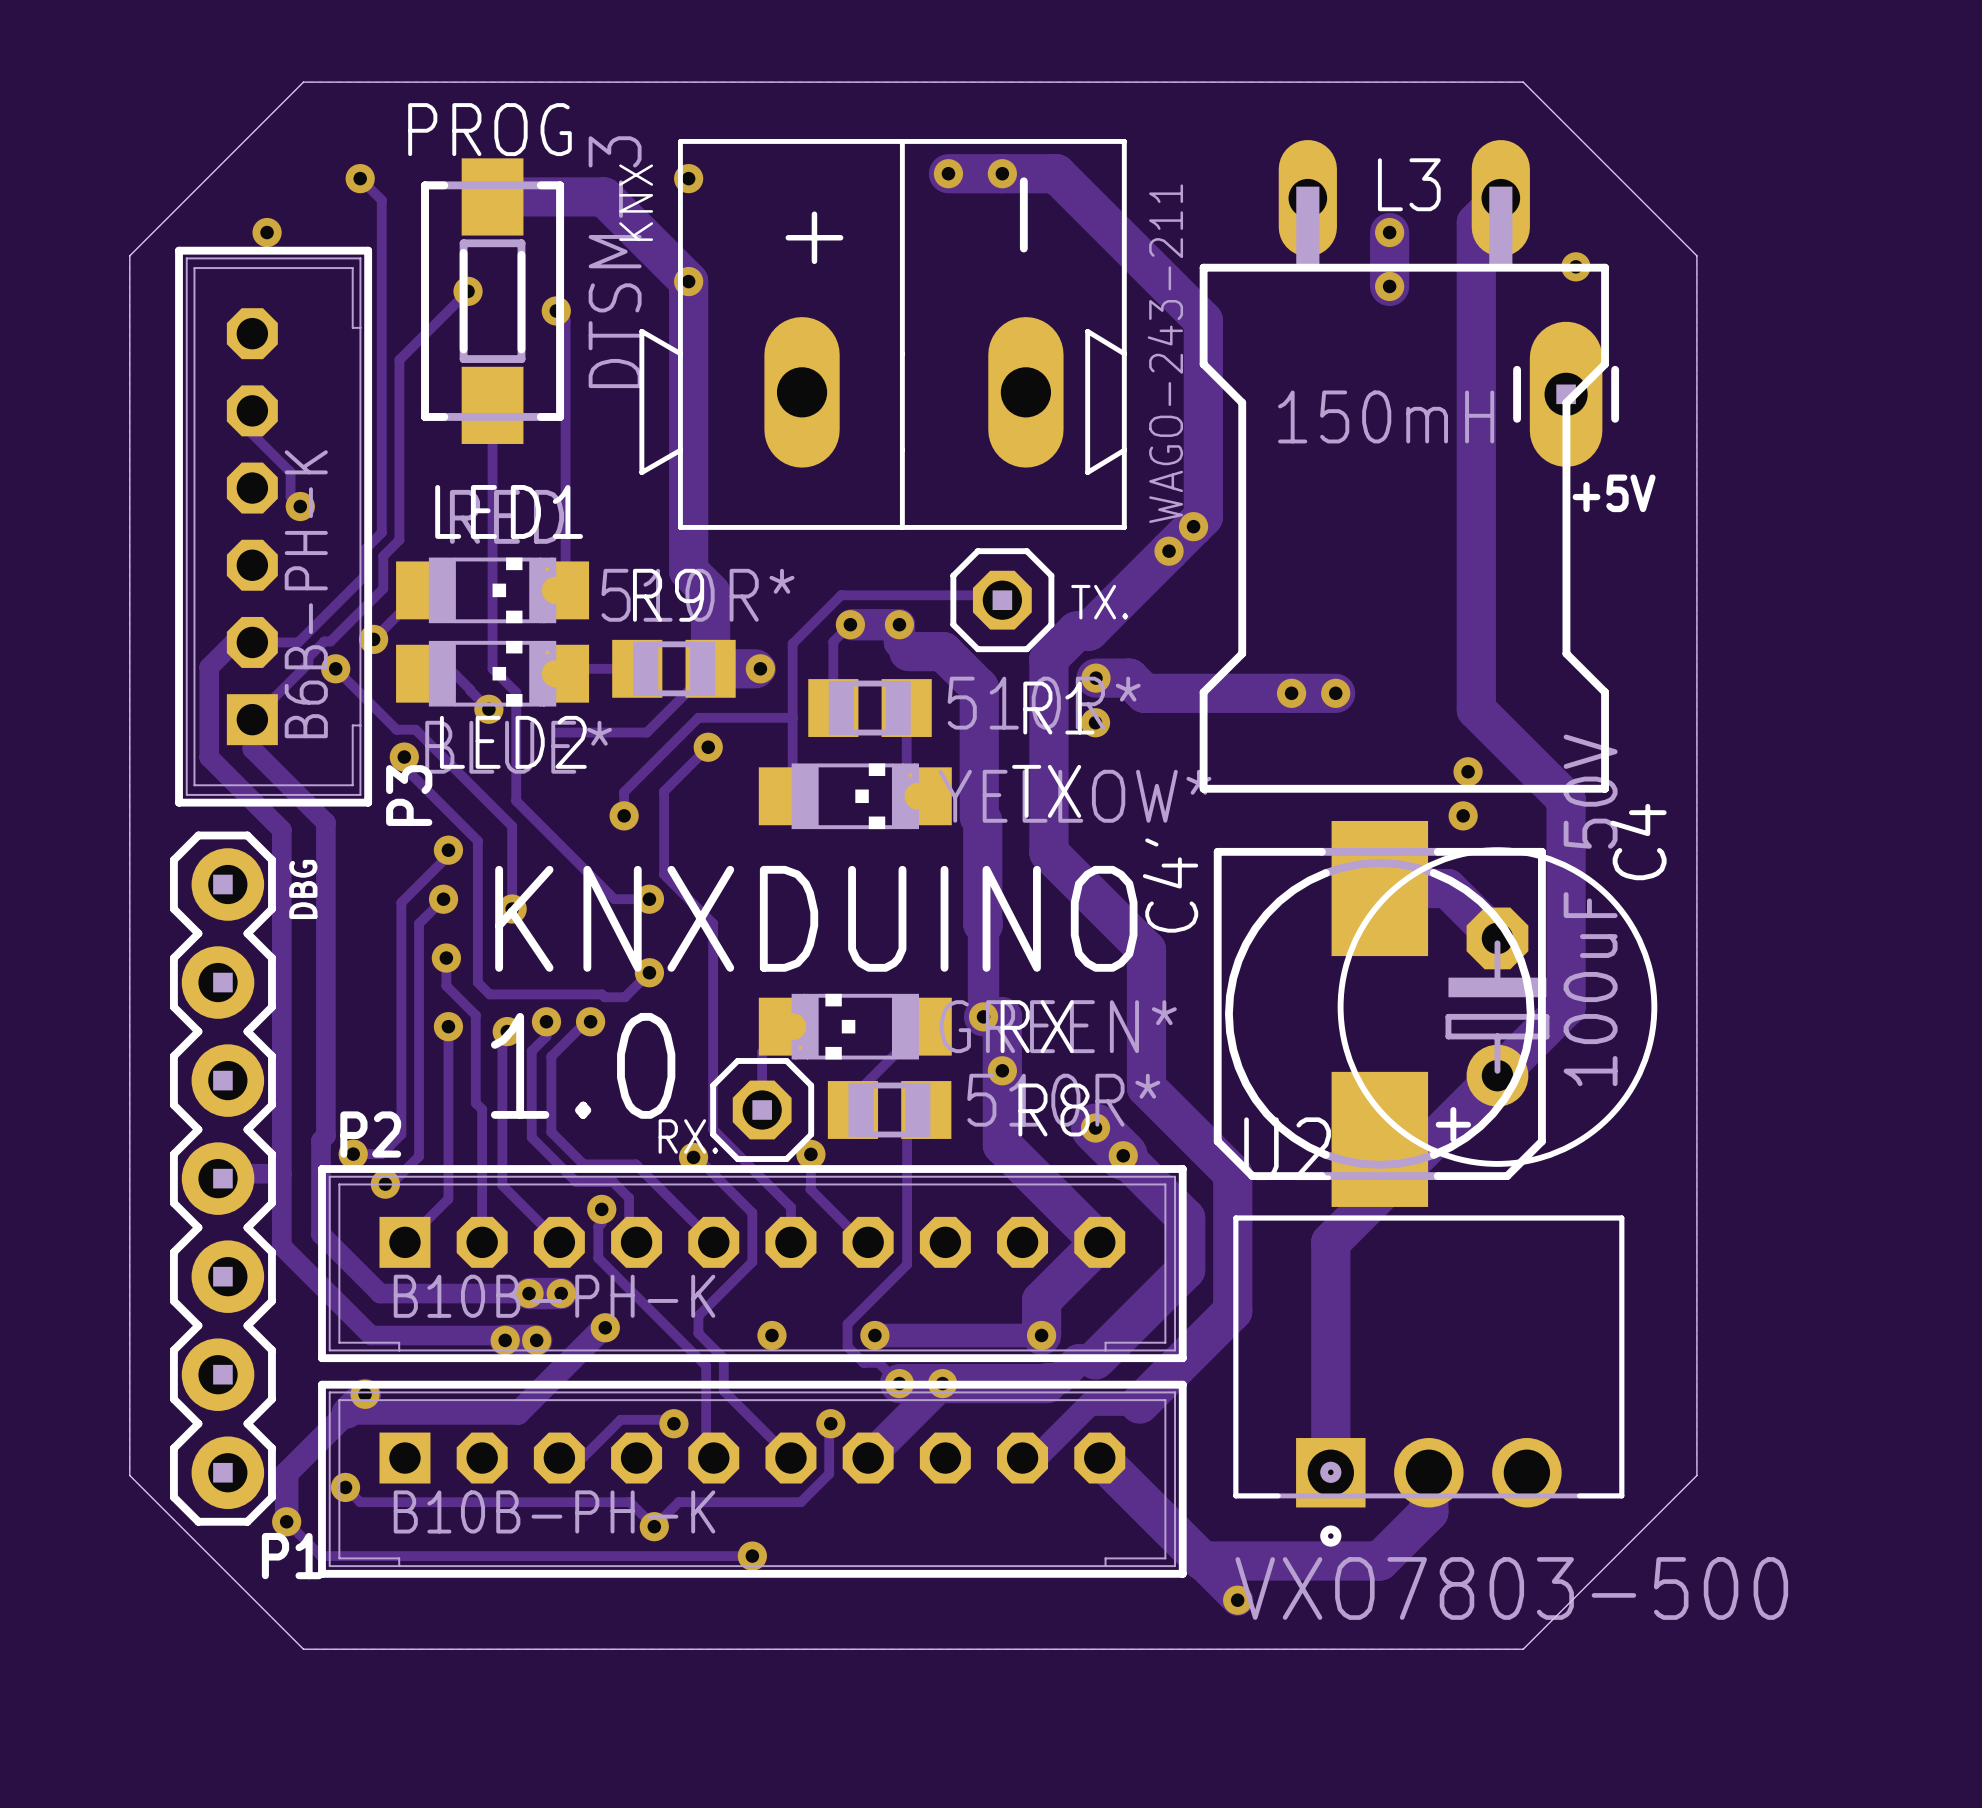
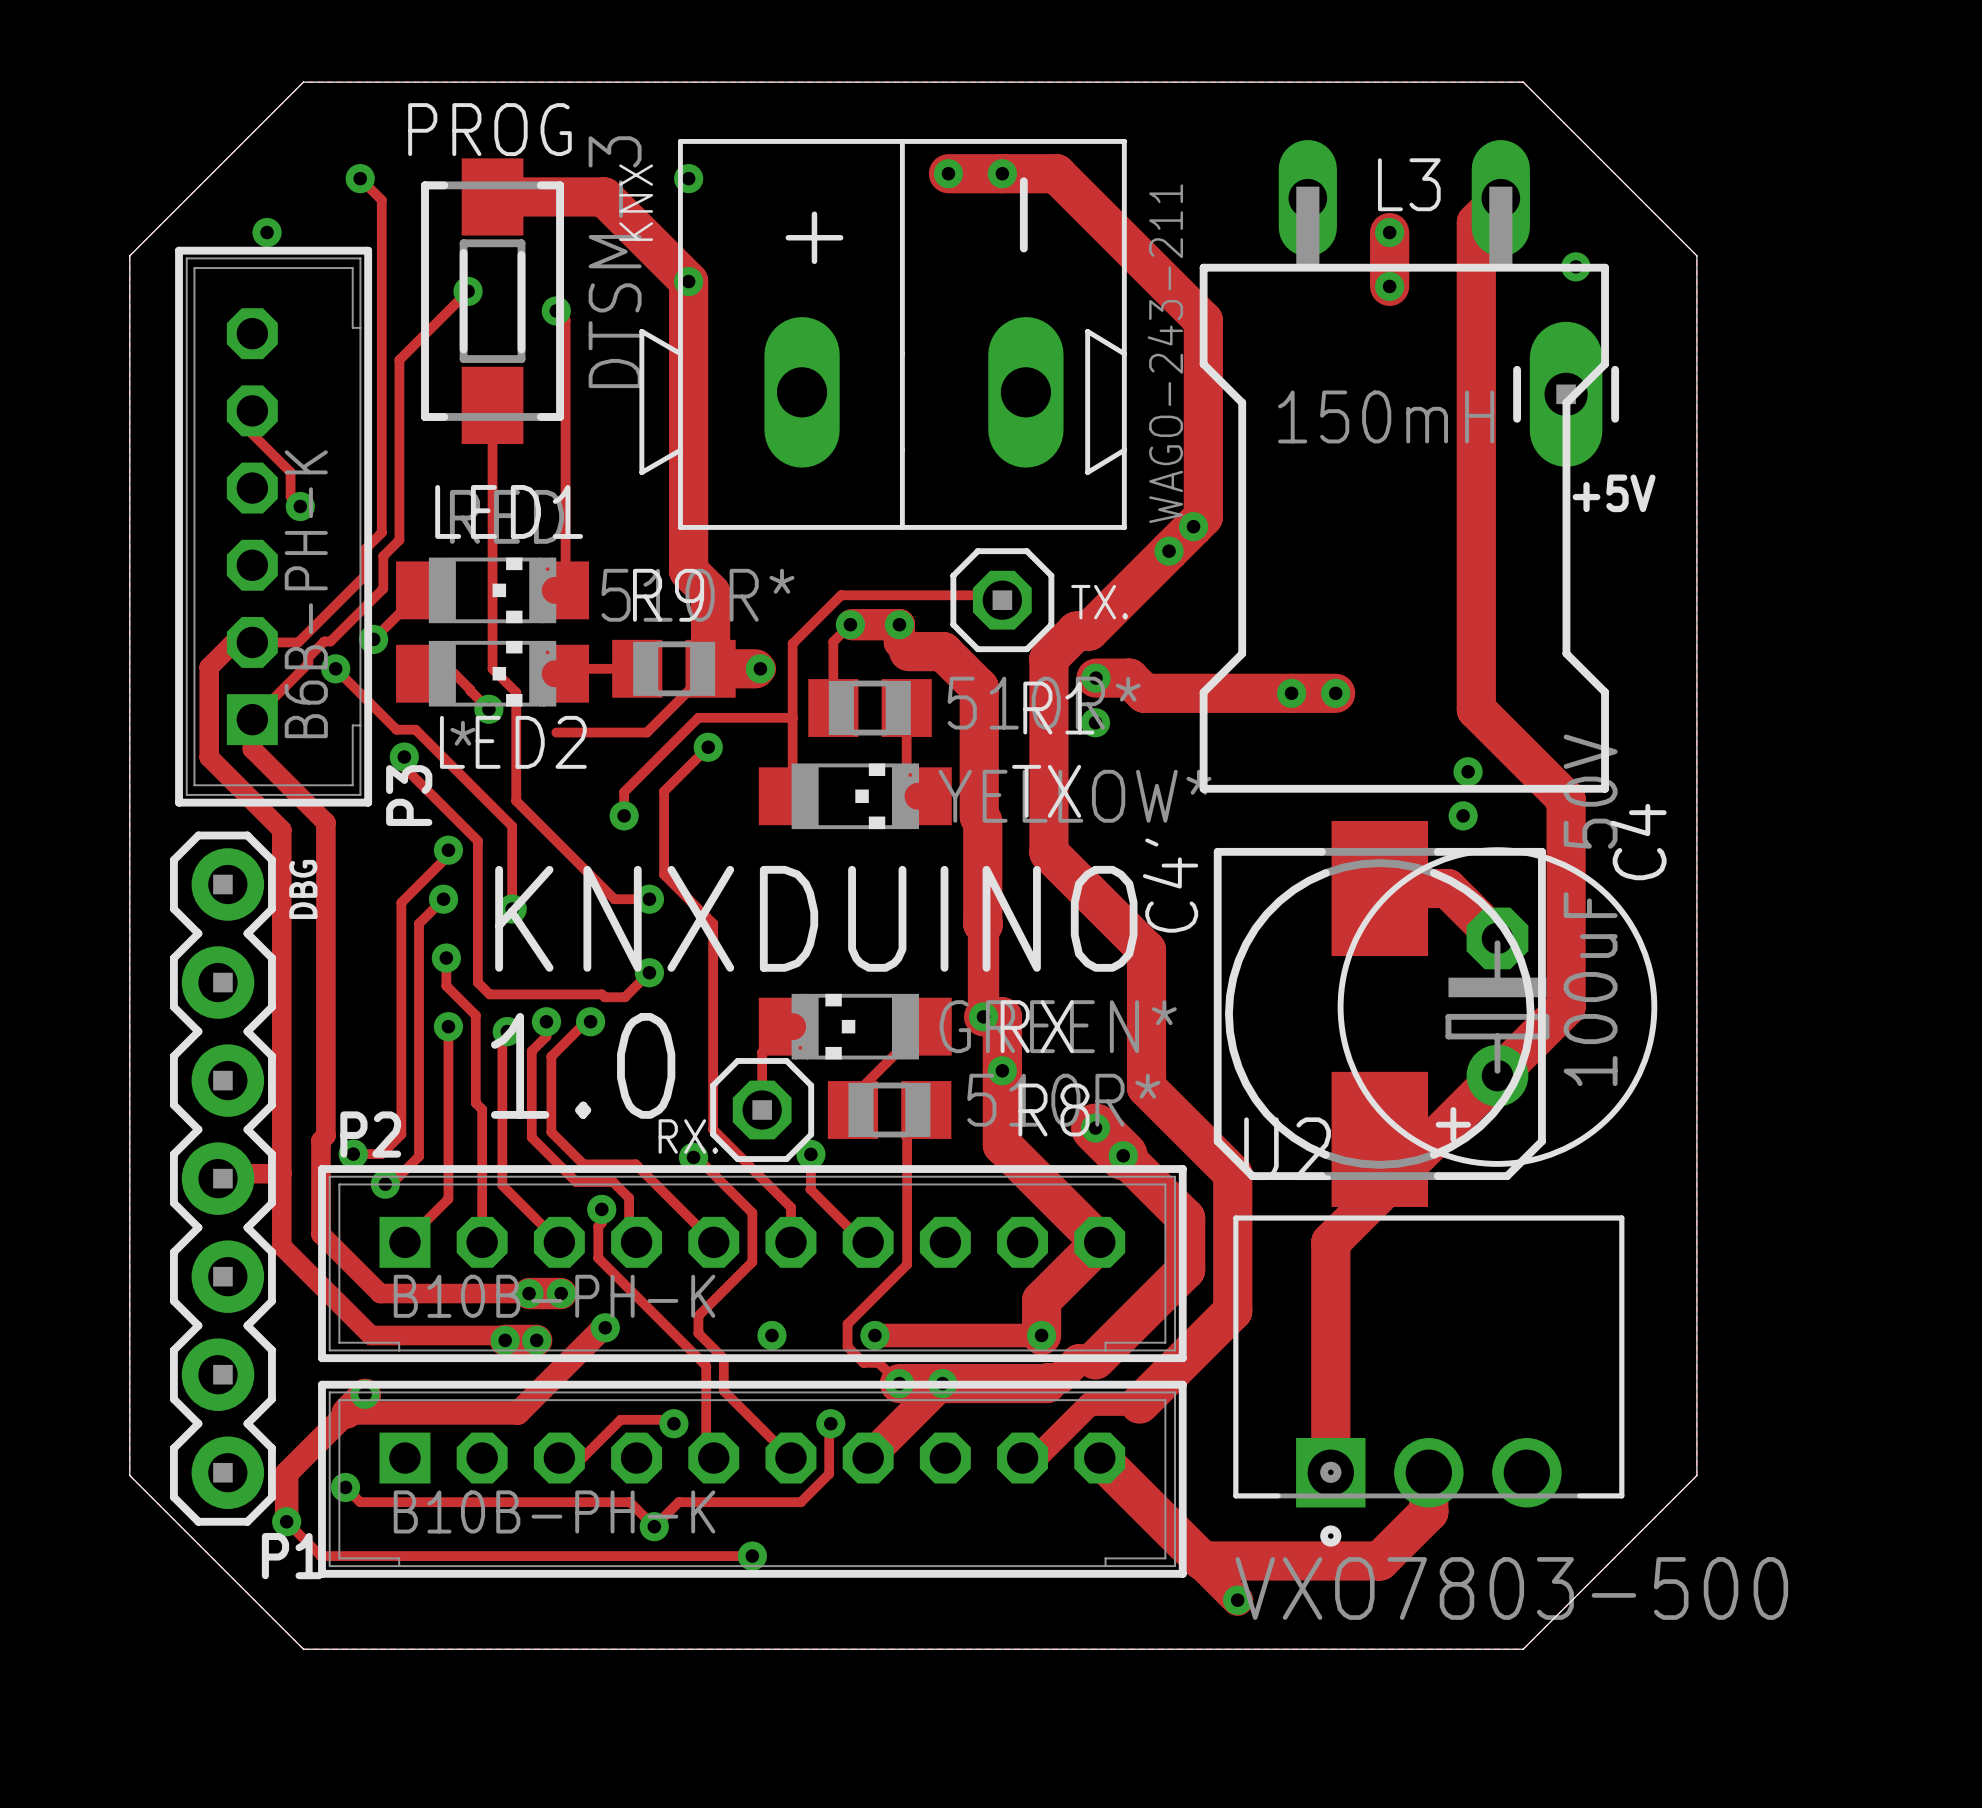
LED2 value: BLUE* (518, 747) -> * (462, 733)

